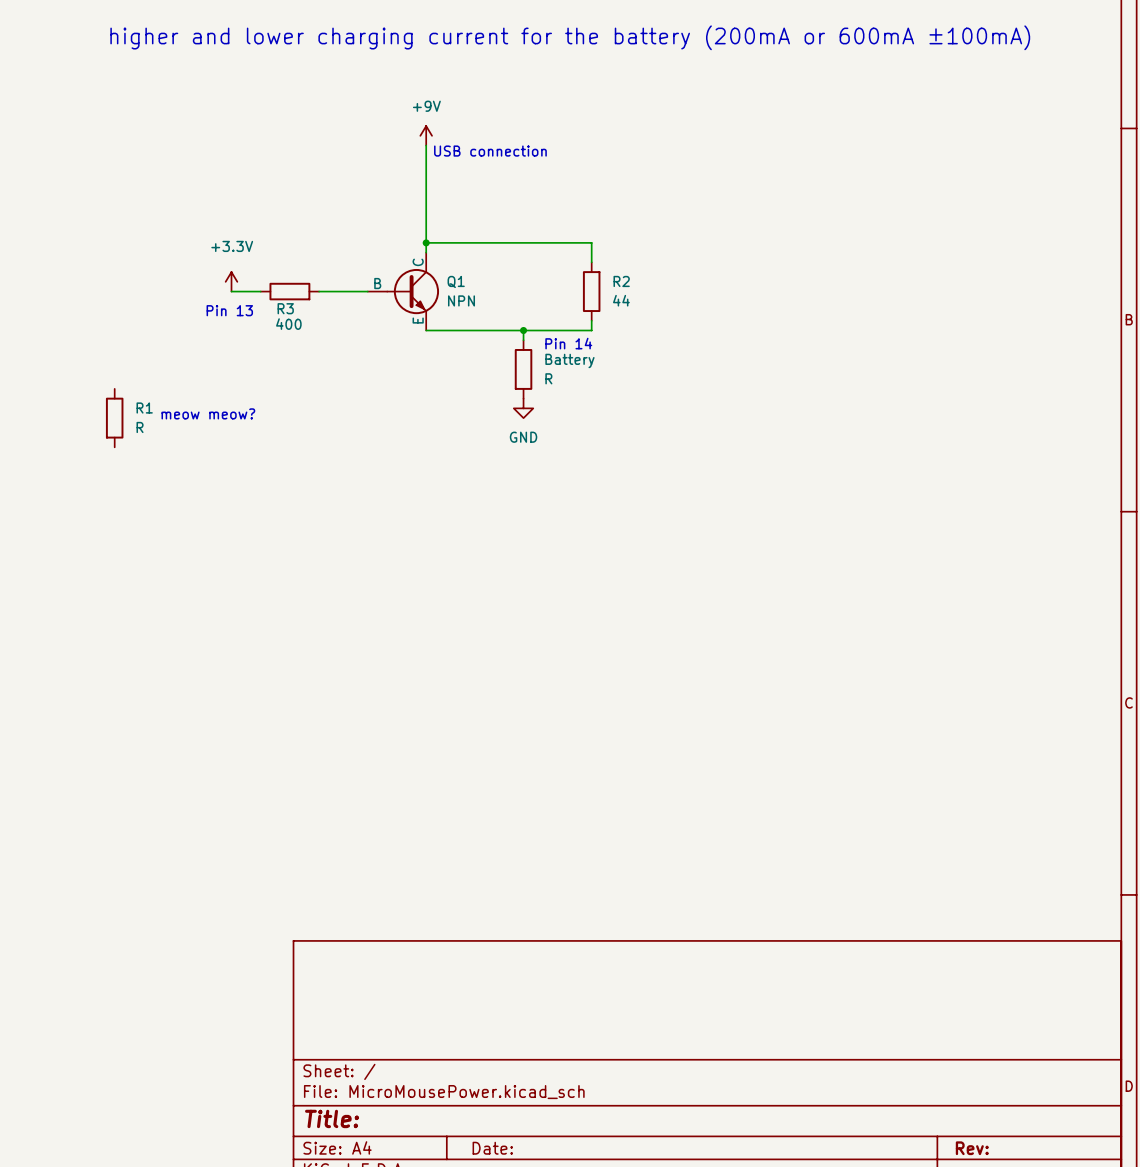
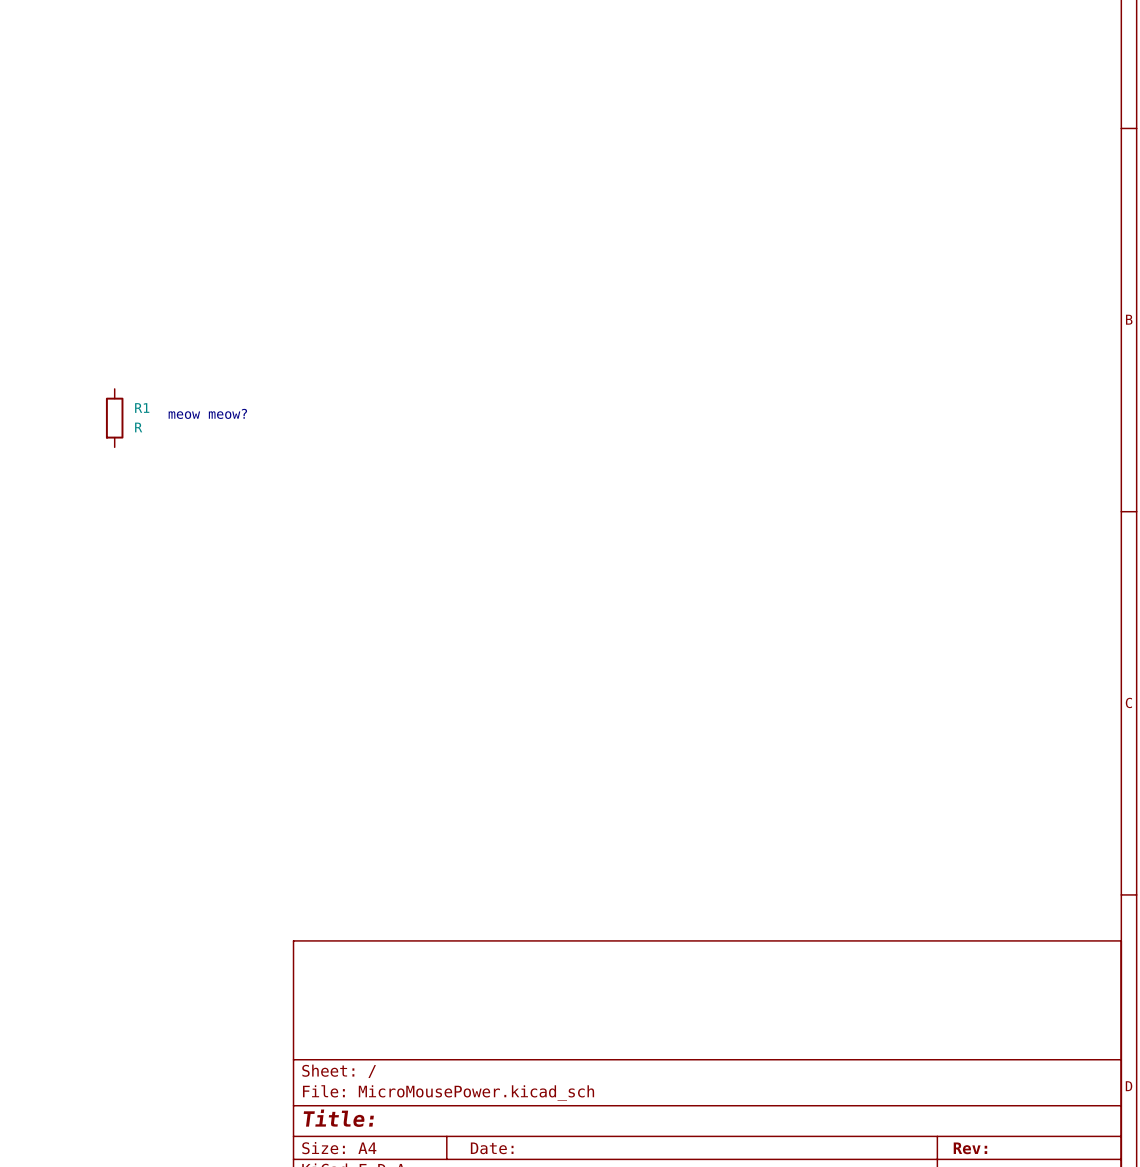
text: higher and lower charging current for the battery (200mA or 600mA ±100mA) (570, 37) -> none
power symbol: +9V (426, 135) -> none
wire: (426, 145) (426, 252) -> none
text: USB connection (490, 151) -> none
wire: (426, 242) (591, 242) (591, 262) -> none
junction: (426, 242) -> none
power symbol: +3.3V (231, 281) -> none
wire: (231, 291) (260, 291) -> none
R3: 400 (289, 291) -> none
wire: (319, 291) (367, 291) -> none
Q1: NPN (403, 291) -> none
R2: 44 (591, 291) -> none
text: Pin 13 (229, 310) -> none
wire: (591, 320) (591, 330) (426, 330) -> none
wire: (523, 330) (523, 340) -> none
junction: (523, 330) -> none
text: Pin 14 (568, 343) -> none
Battery: R (523, 369) -> none
power symbol: GND (523, 408) -> none

